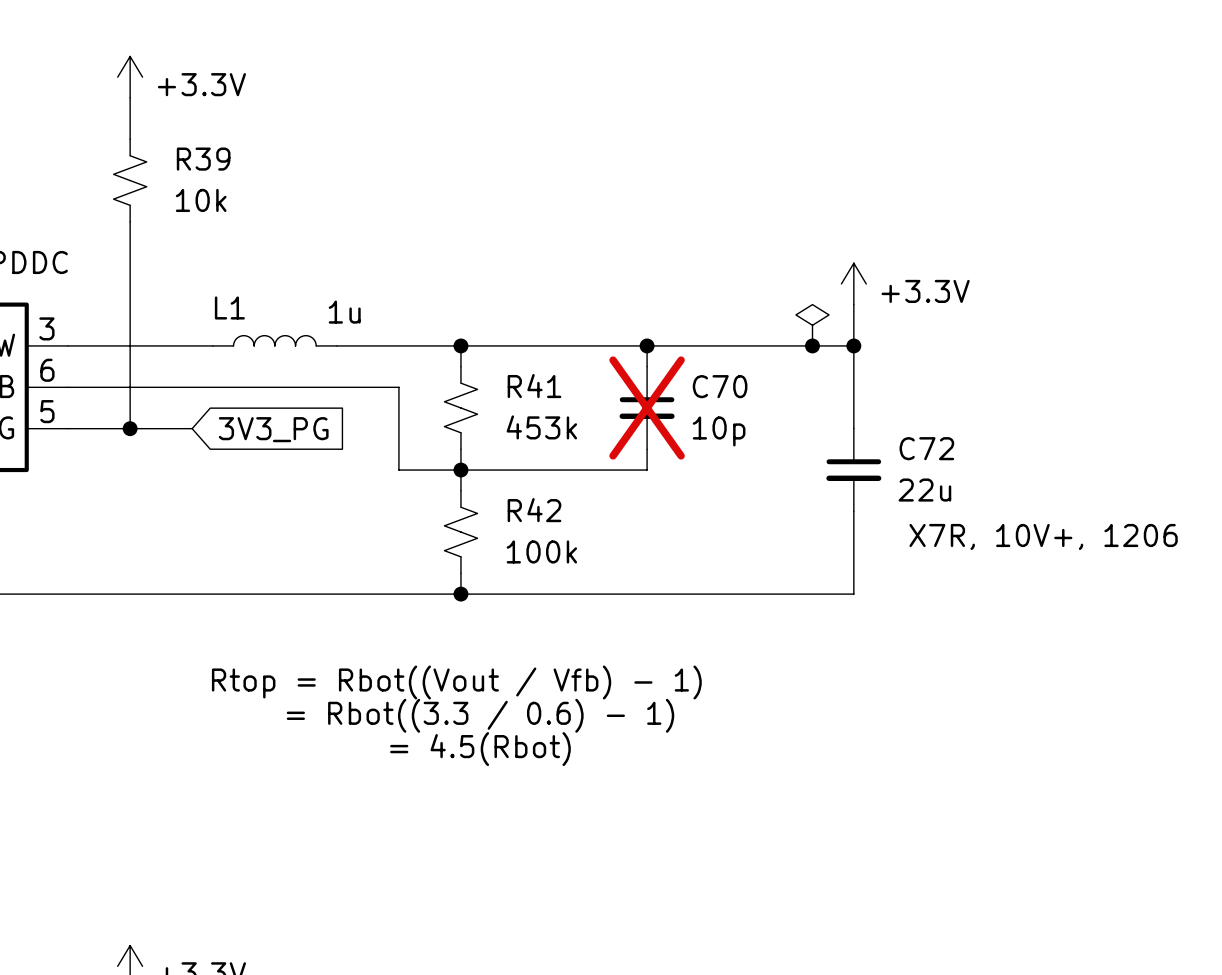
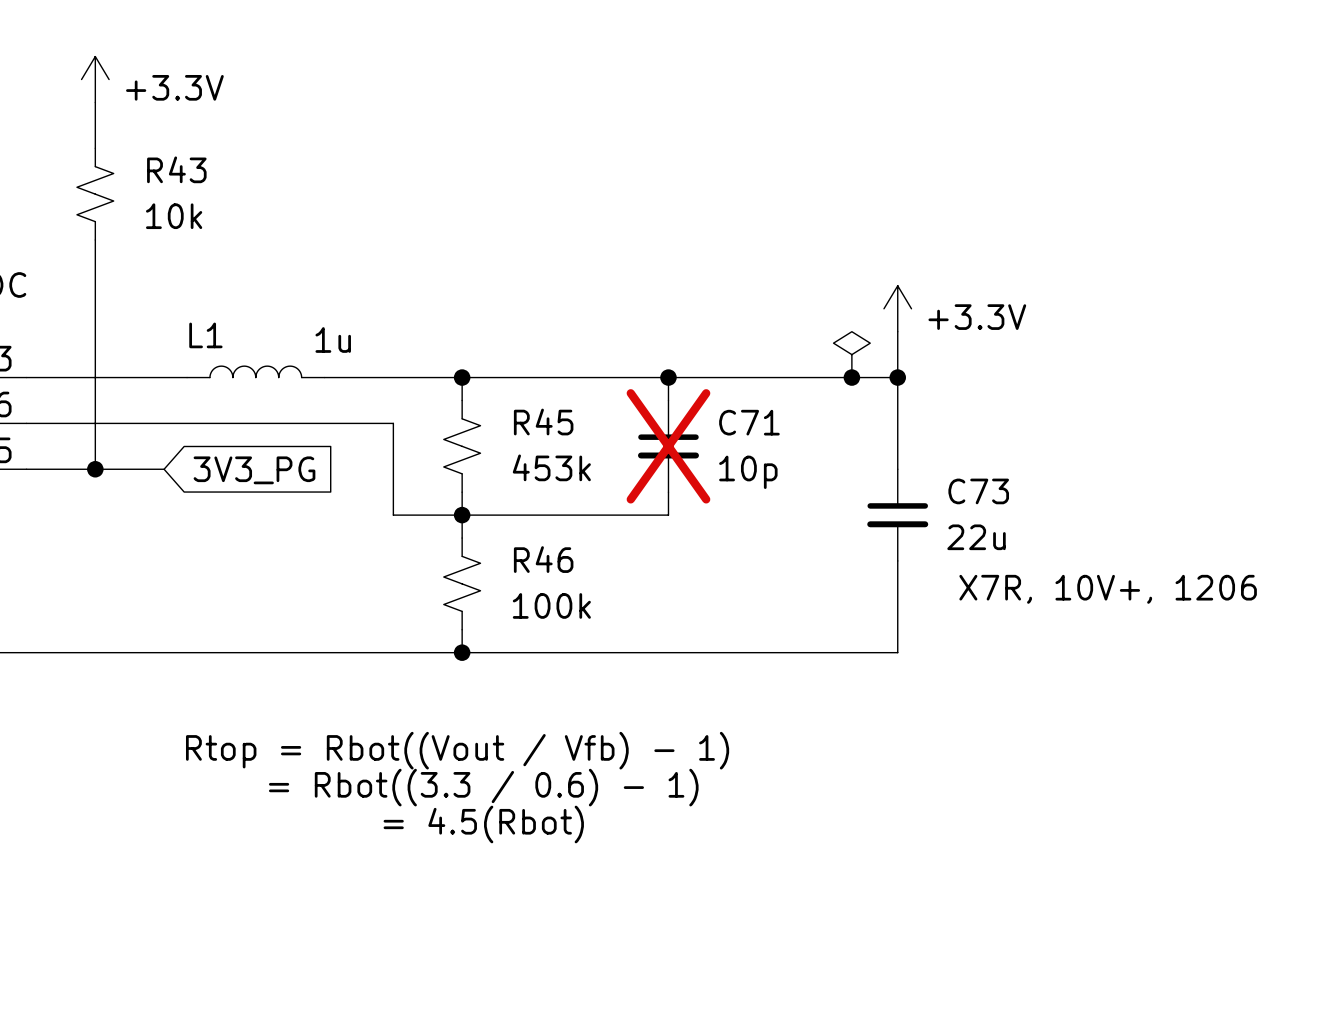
R39 name: R39 (203, 159) -> R43 (176, 169)
R41 name: R41 (534, 386) -> R45 (543, 422)
C70 name: C70 (720, 386) -> C71 (749, 422)
C72 name: C72 (926, 448) -> C73 (978, 491)
R42 name: R42 (534, 510) -> R46 (543, 559)

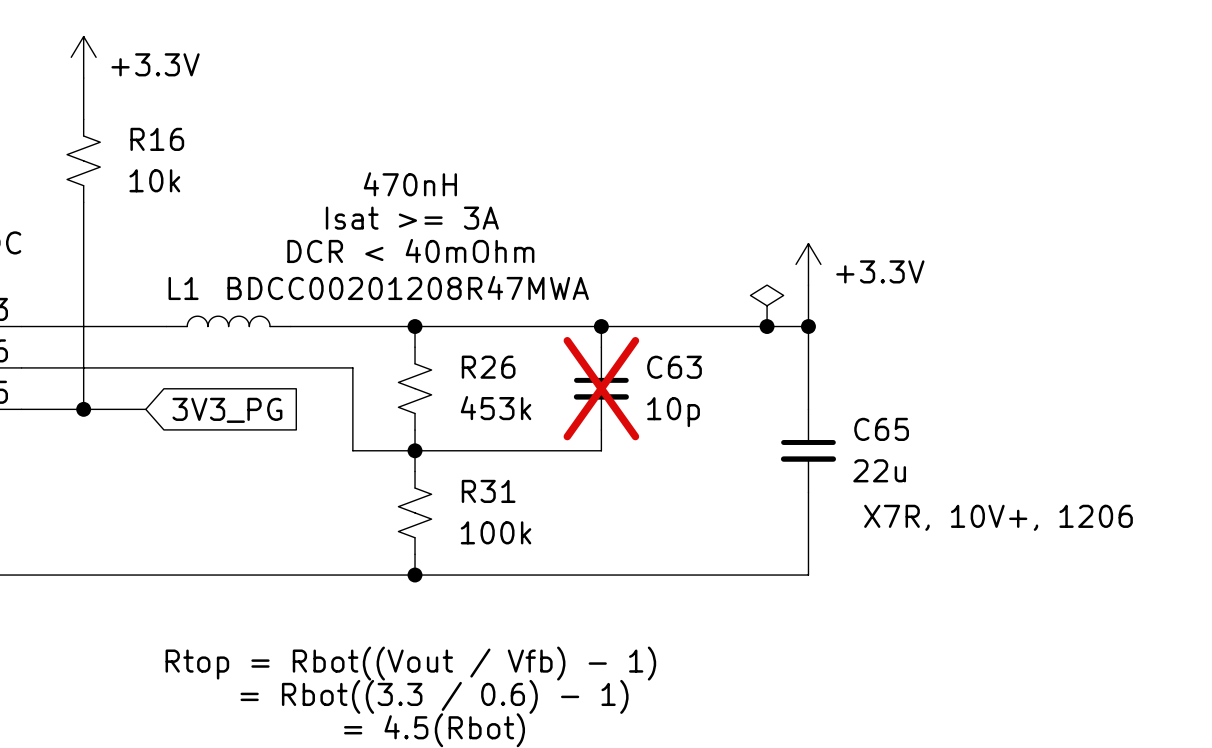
R43 name: R43 (176, 169) -> R16 (157, 139)
text: none -> 470nH (410, 184)
text: none -> Isat >= 3A (412, 218)
text: none -> DCR < 40mOhm (410, 250)
L1 value: 1u (333, 340) -> BDCC00201208R47MWA (408, 287)
R45 name: R45 (543, 422) -> R26 (488, 367)
C71 name: C71 (749, 422) -> C63 (674, 367)
C73 name: C73 (978, 491) -> C65 (881, 429)
R46 name: R46 (543, 559) -> R31 (488, 491)

